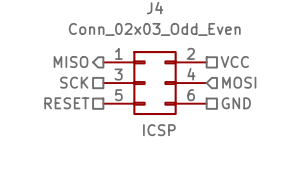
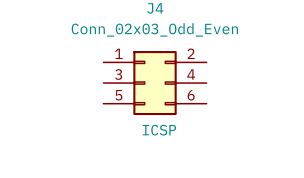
hierarchical label: MISO (71, 62) -> none
hierarchical label: VCC (234, 62) -> none
hierarchical label: SCK (74, 82) -> none
hierarchical label: MOSI (239, 82) -> none
hierarchical label: RESET (66, 103) -> none
hierarchical label: GND (236, 103) -> none

